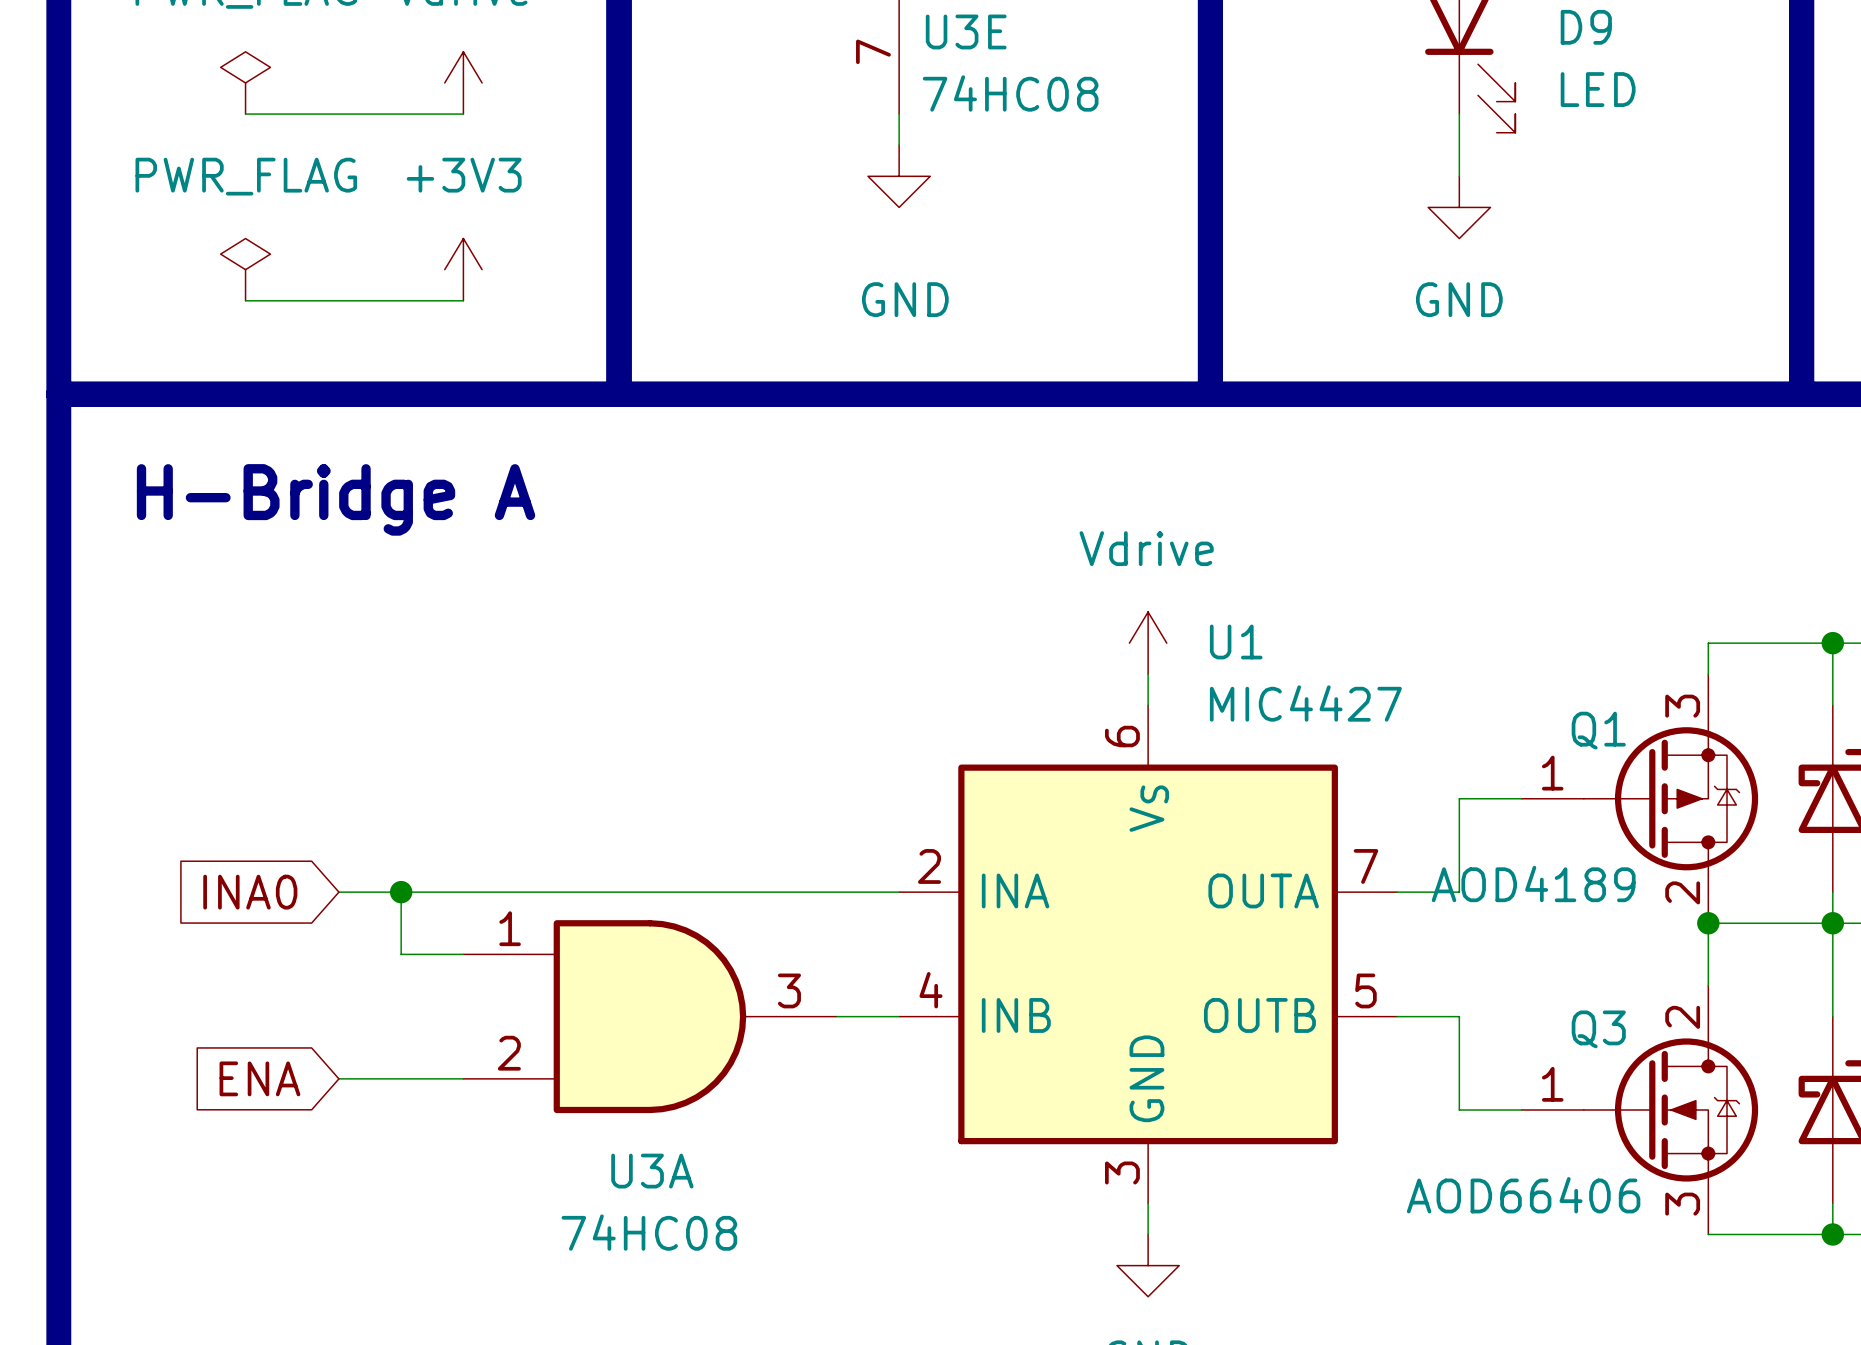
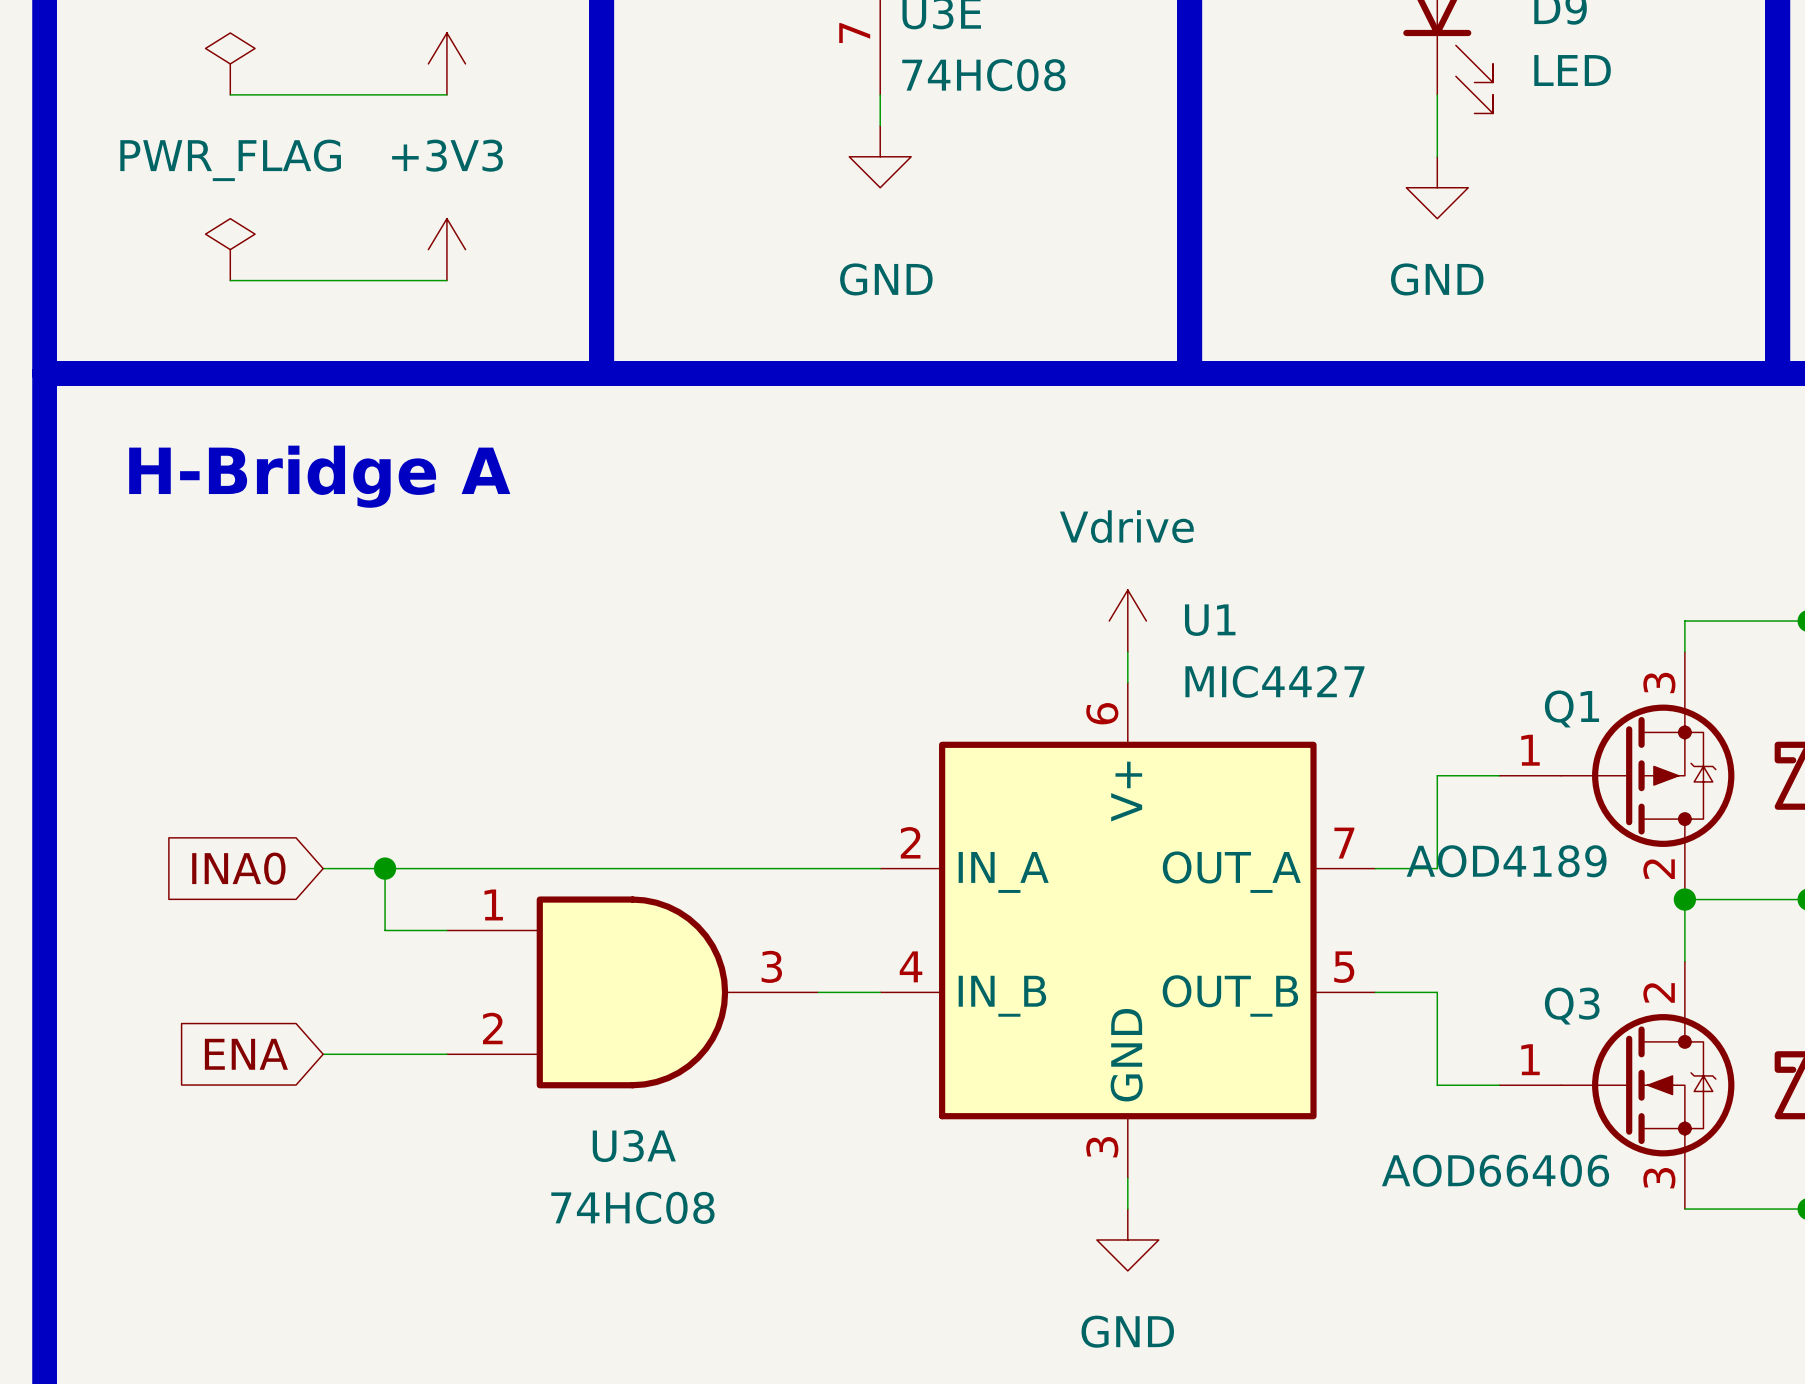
U1 pin name: VS (1149, 808) -> V+ (1126, 791)
U1 pin name: INA (1015, 890) -> IN_A (1003, 872)
U1 pin name: OUTA (1263, 890) -> OUT_A (1231, 872)
U1 pin name: INB (1016, 1015) -> IN_B (1002, 996)
U1 pin name: OUTB (1259, 1015) -> OUT_B (1230, 995)

